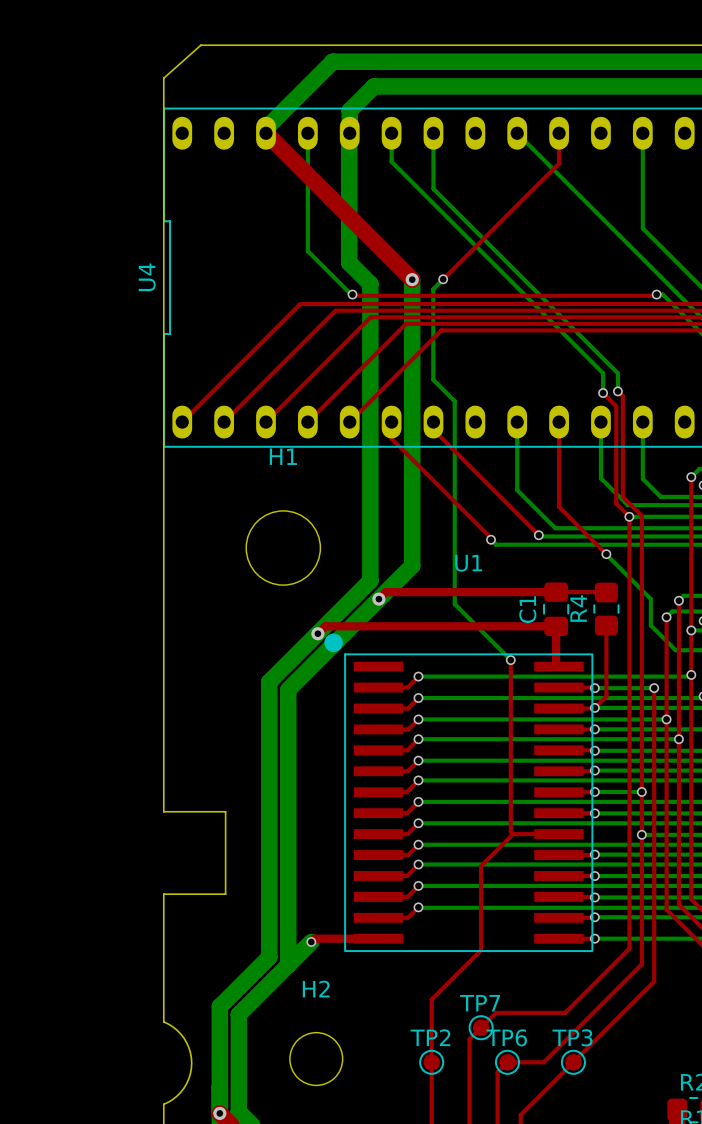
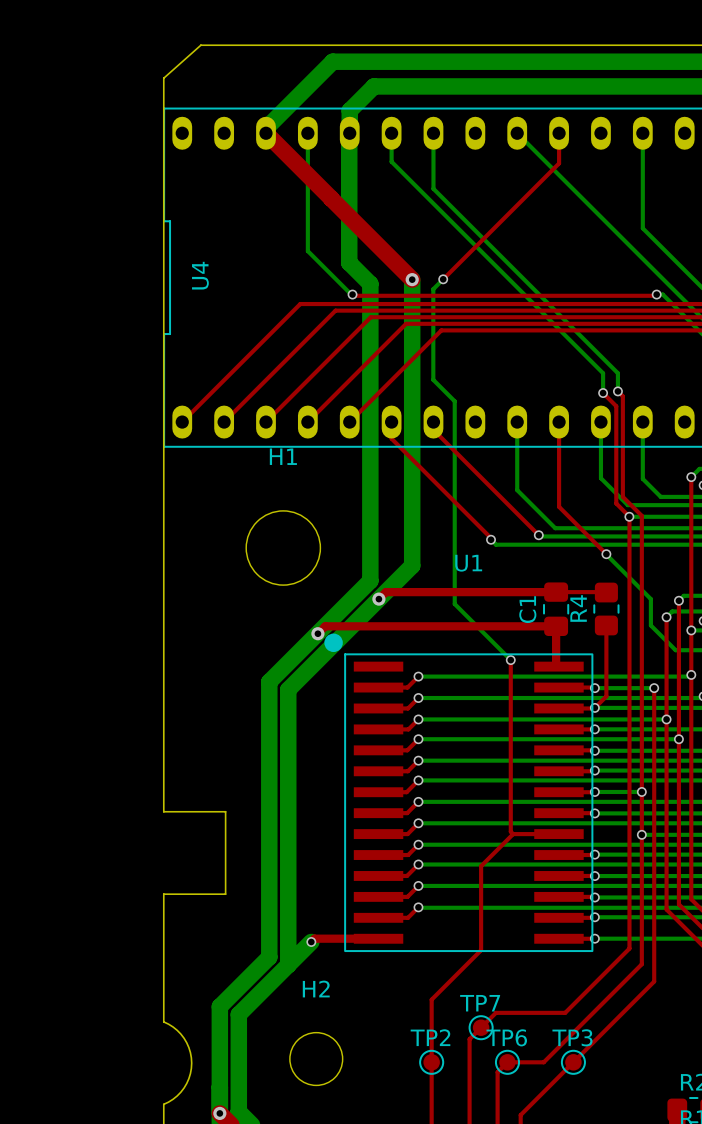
U4 name position: U4 (147, 277) -> U4 (200, 275)

